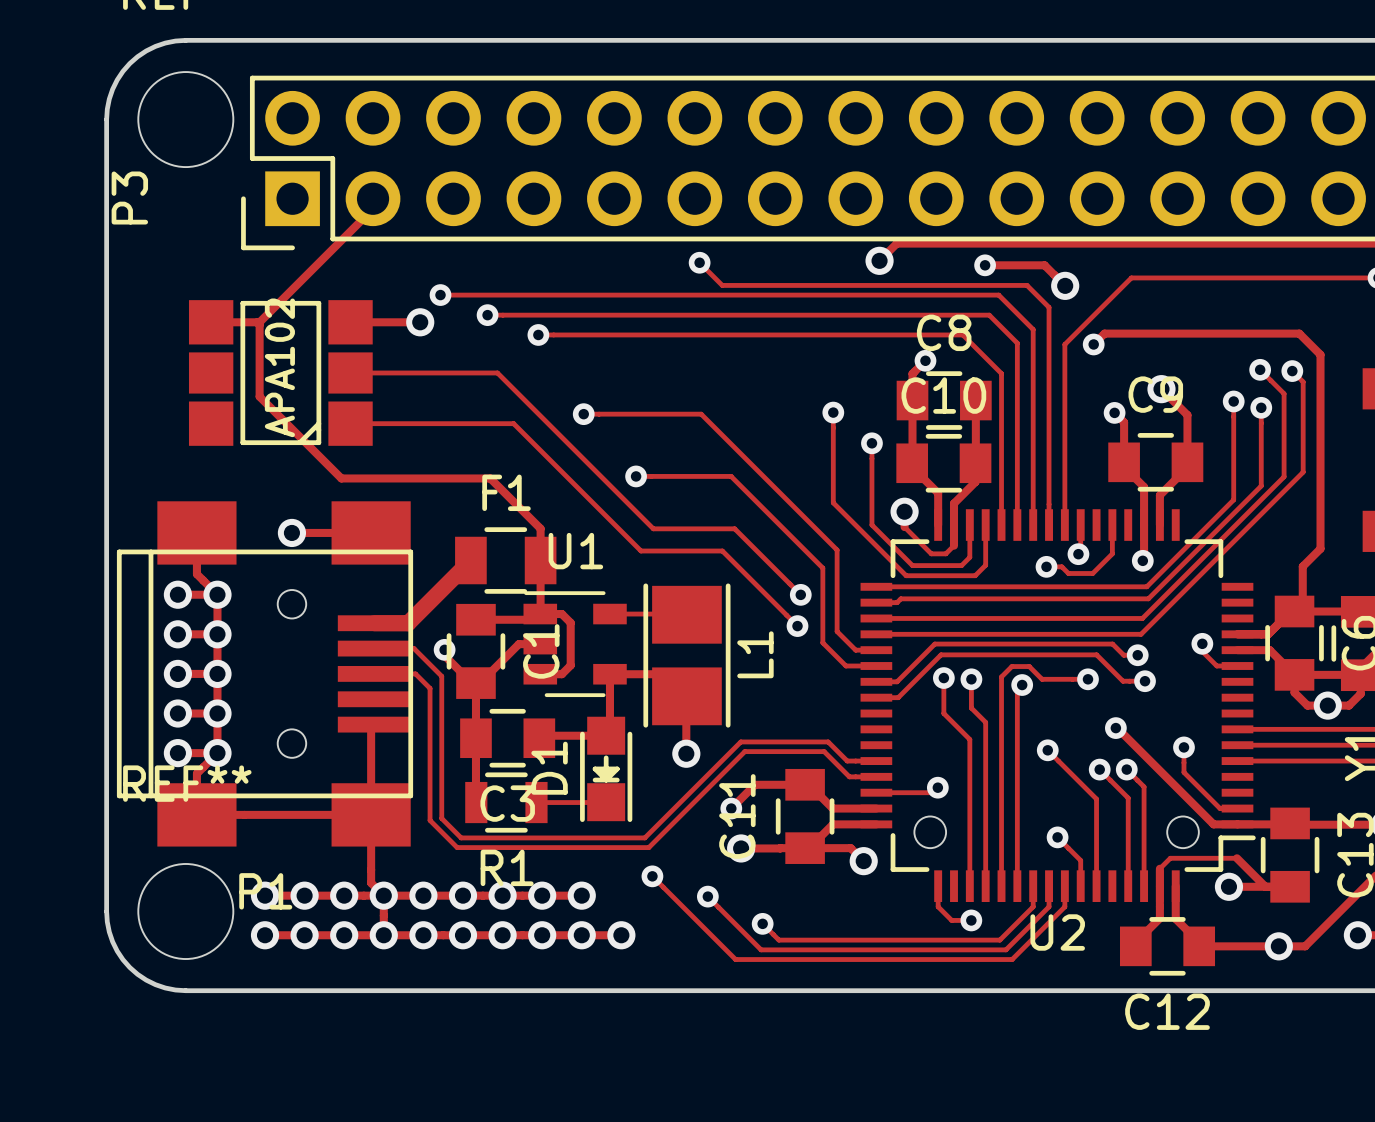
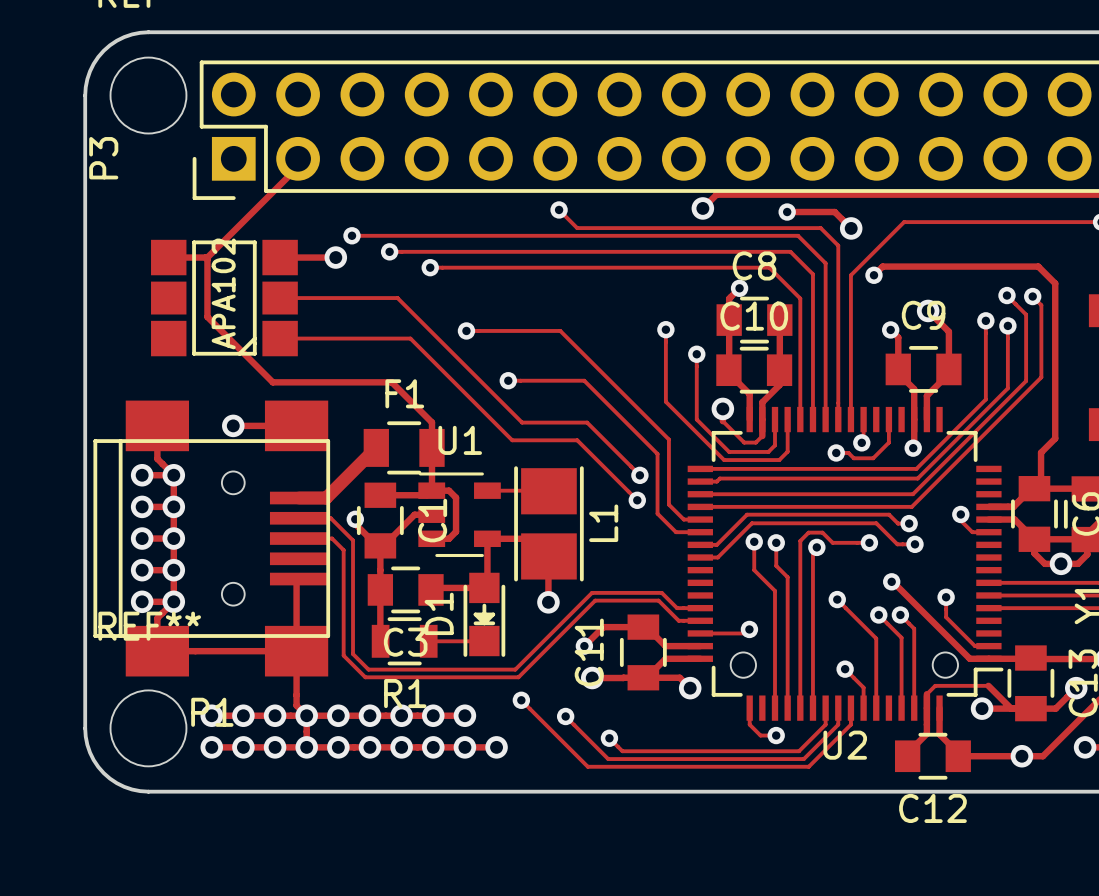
track: none -> (1076, 688) (1055, 708) (1030, 708)
via: none -> (1076, 688)

